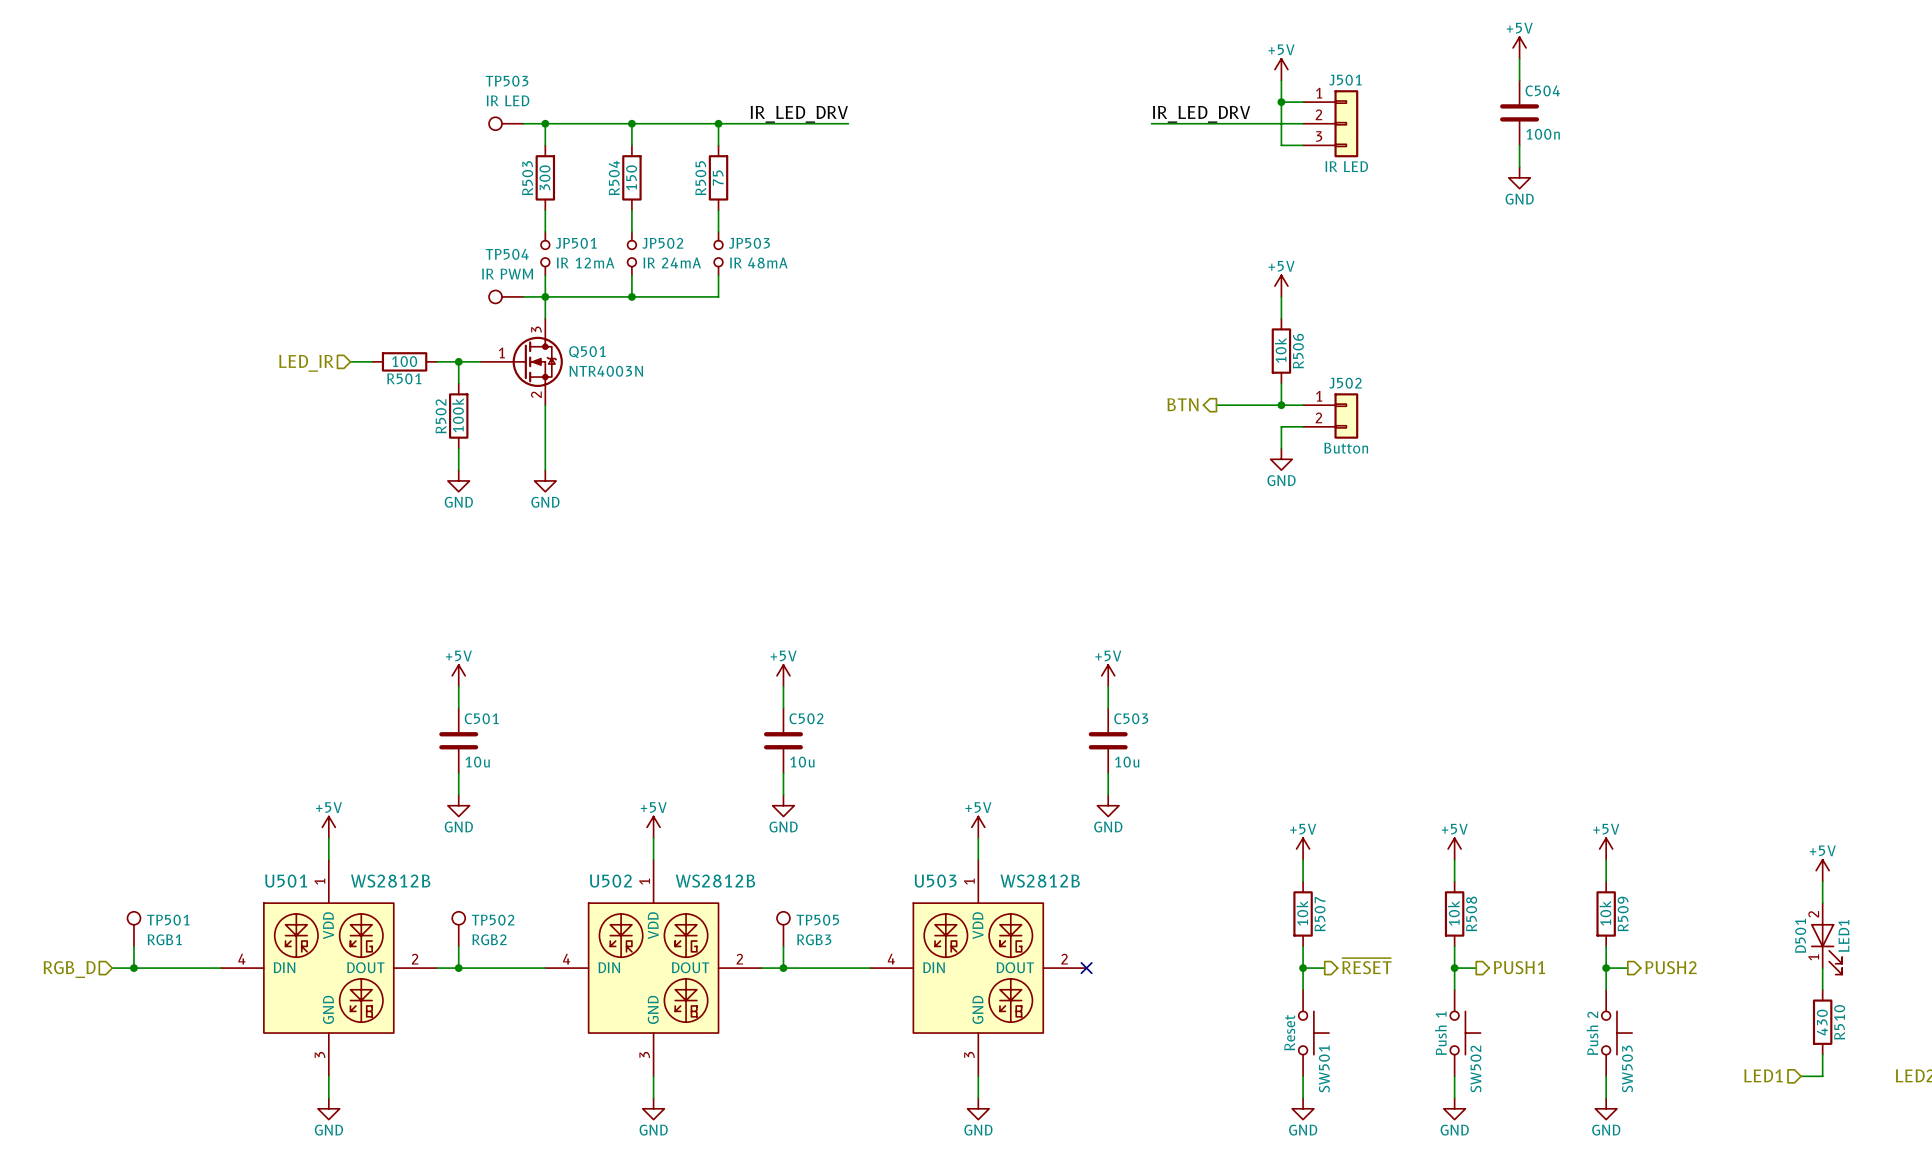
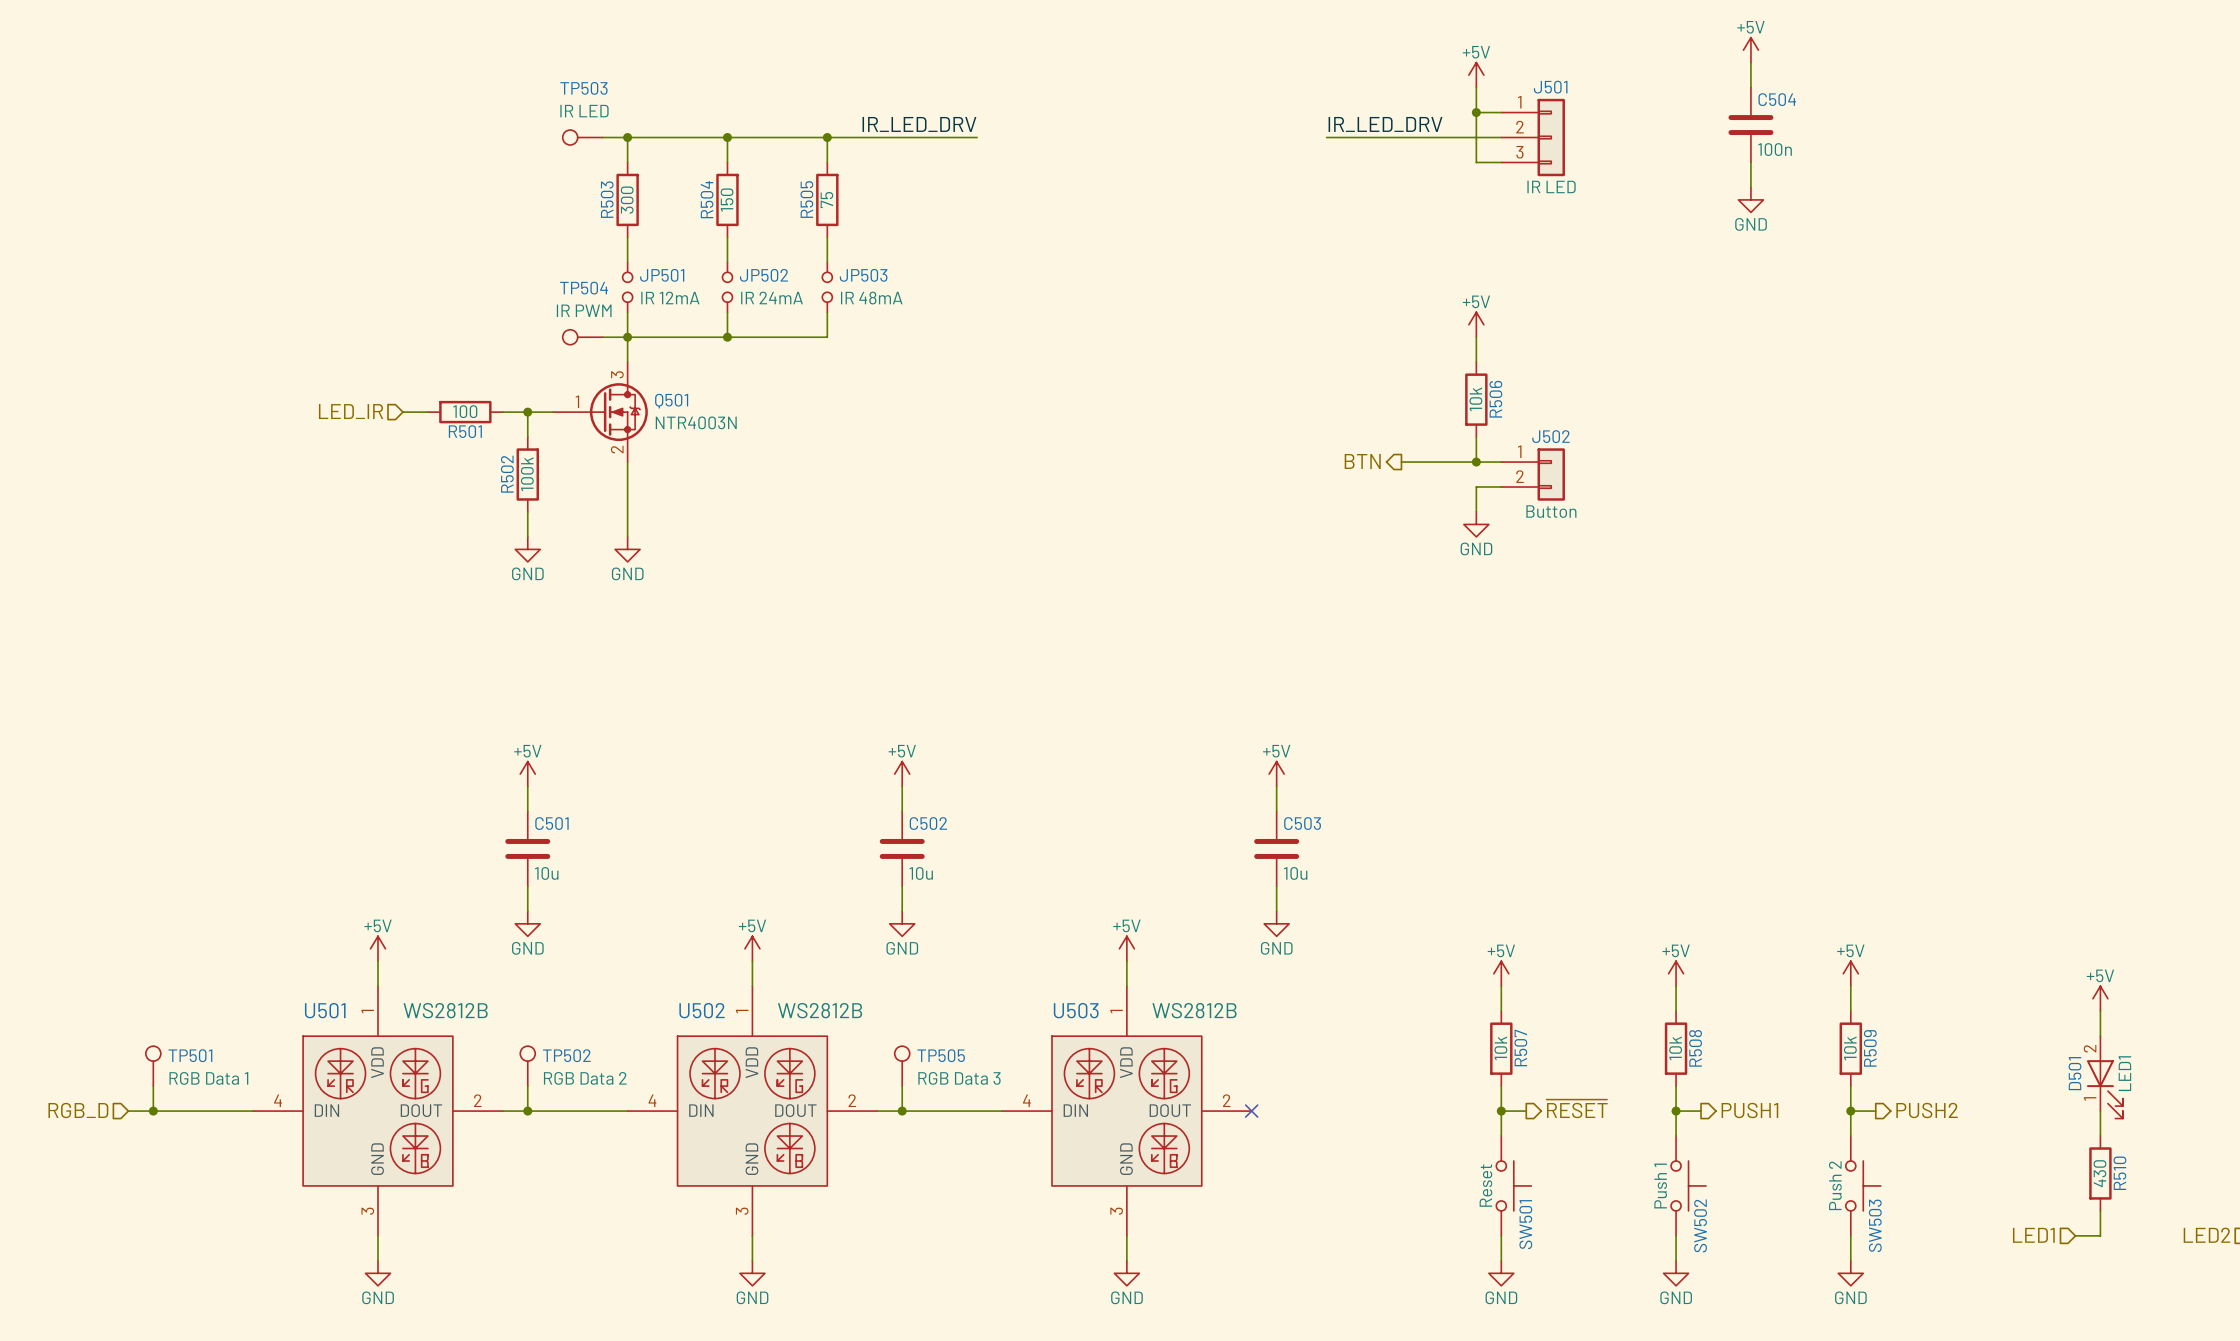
TP501 value: RGB1 (164, 939) -> RGB Data 1 (208, 1078)
TP502 value: RGB2 (489, 939) -> RGB Data 2 (585, 1078)
TP505 value: RGB3 (814, 939) -> RGB Data 3 (959, 1078)

